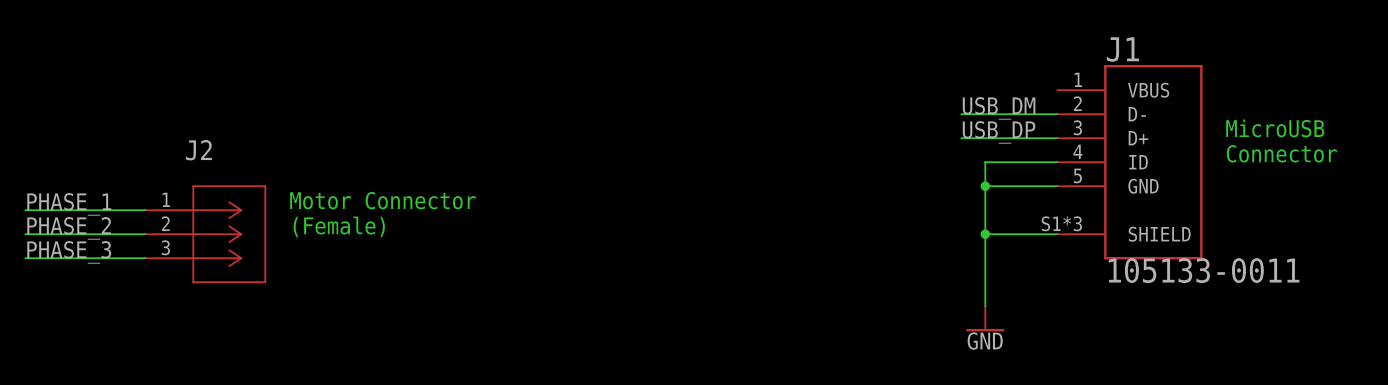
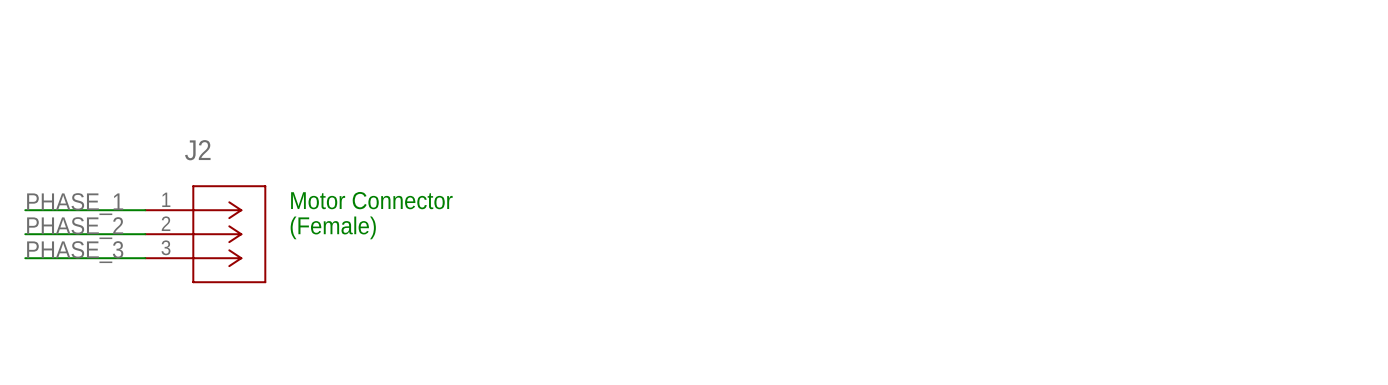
label: USB_DM (999, 108) -> none
wire: (961, 114) (1057, 114) -> none
text: MicroUSB (1275, 128) -> none
label: USB_DP (999, 132) -> none
wire: (961, 138) (1057, 138) -> none
text: Connector (1281, 153) -> none
wire: (1057, 162) (985, 162) (985, 306) -> none
J1: 105133-0011 (1129, 162) -> none
wire: (985, 186) (1057, 186) -> none
junction: (985, 186) -> none
wire: (985, 234) (1057, 234) -> none
junction: (985, 234) -> none
power symbol: GND (985, 318) -> none

